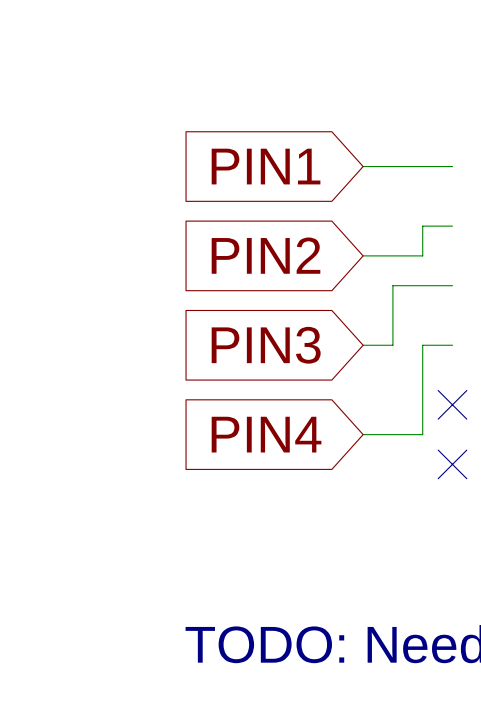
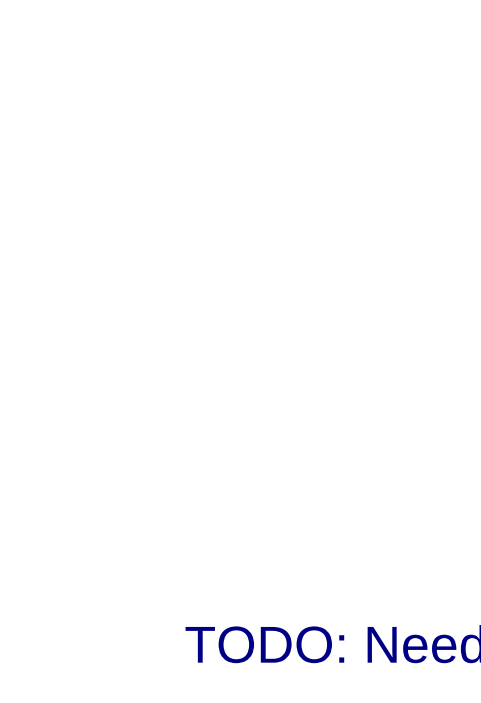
global label: PIN1 (266, 166) -> none
wire: (363, 166) (452, 166) -> none
wire: (452, 226) (422, 226) (422, 255) (363, 255) -> none
global label: PIN2 (266, 255) -> none
wire: (452, 285) (392, 285) (392, 345) (363, 345) -> none
global label: PIN3 (266, 345) -> none
wire: (452, 345) (422, 345) (422, 434) (363, 434) -> none
no-connect mark: (452, 404) -> none
global label: PIN4 (266, 434) -> none
no-connect mark: (452, 464) -> none

